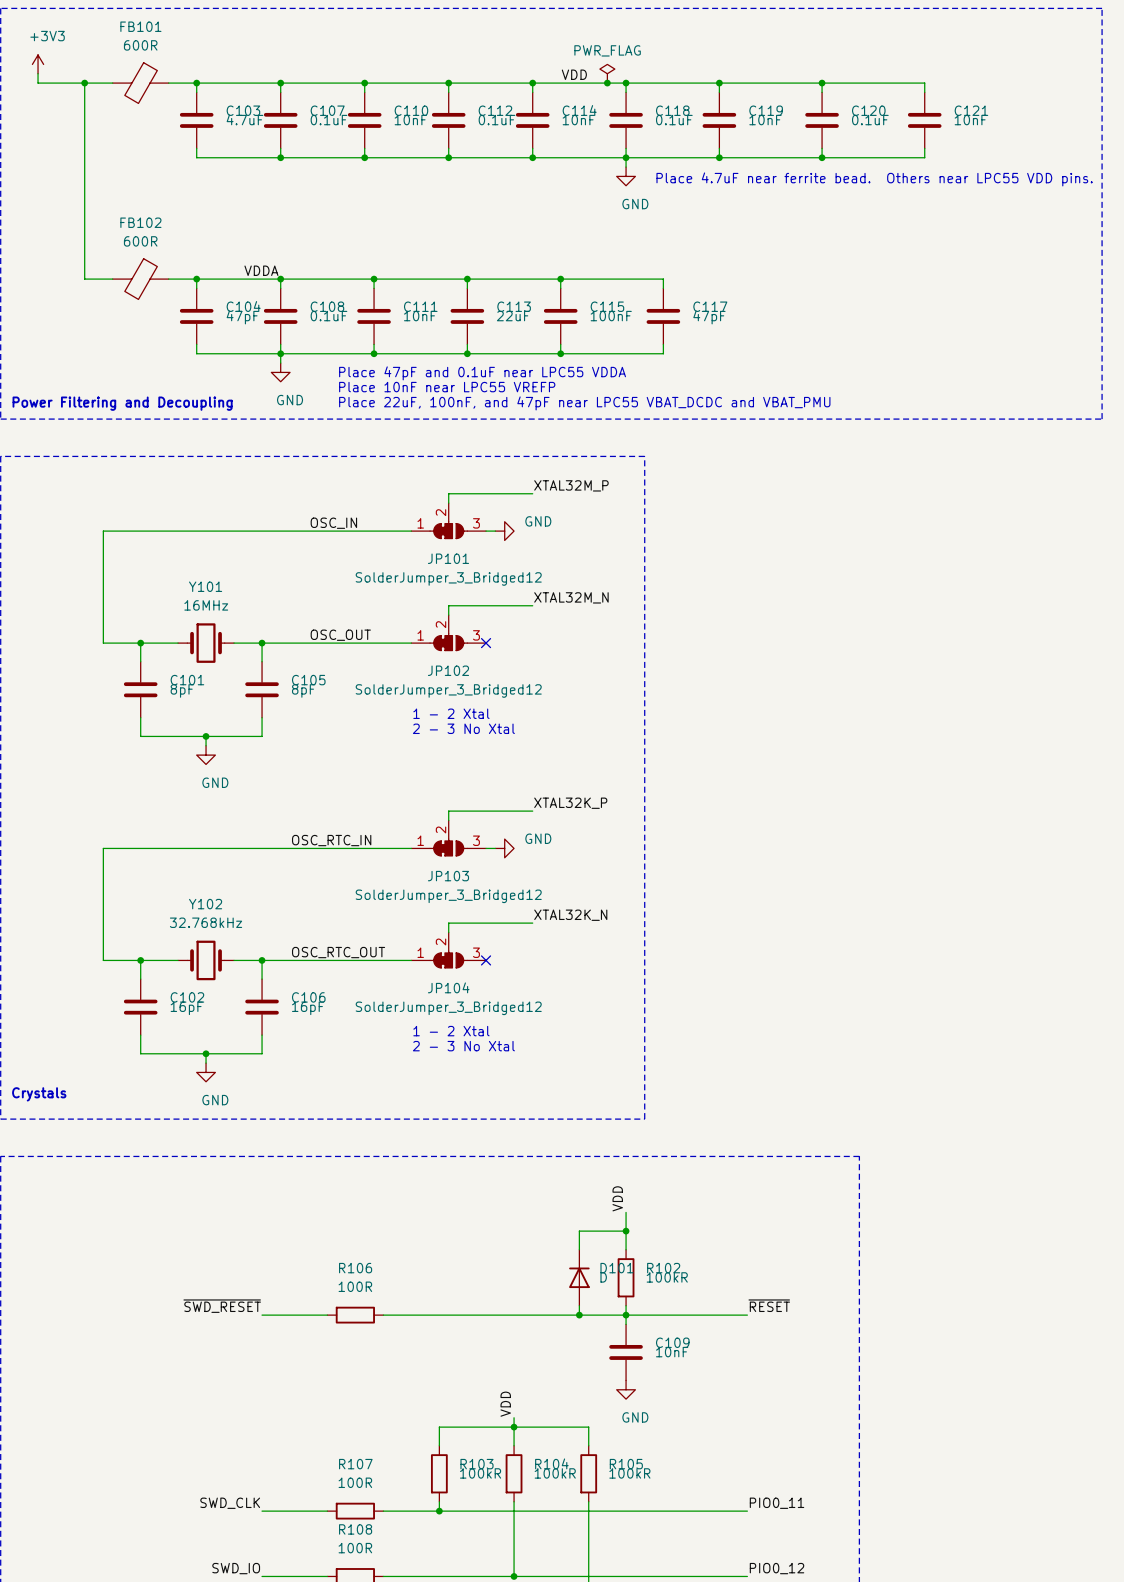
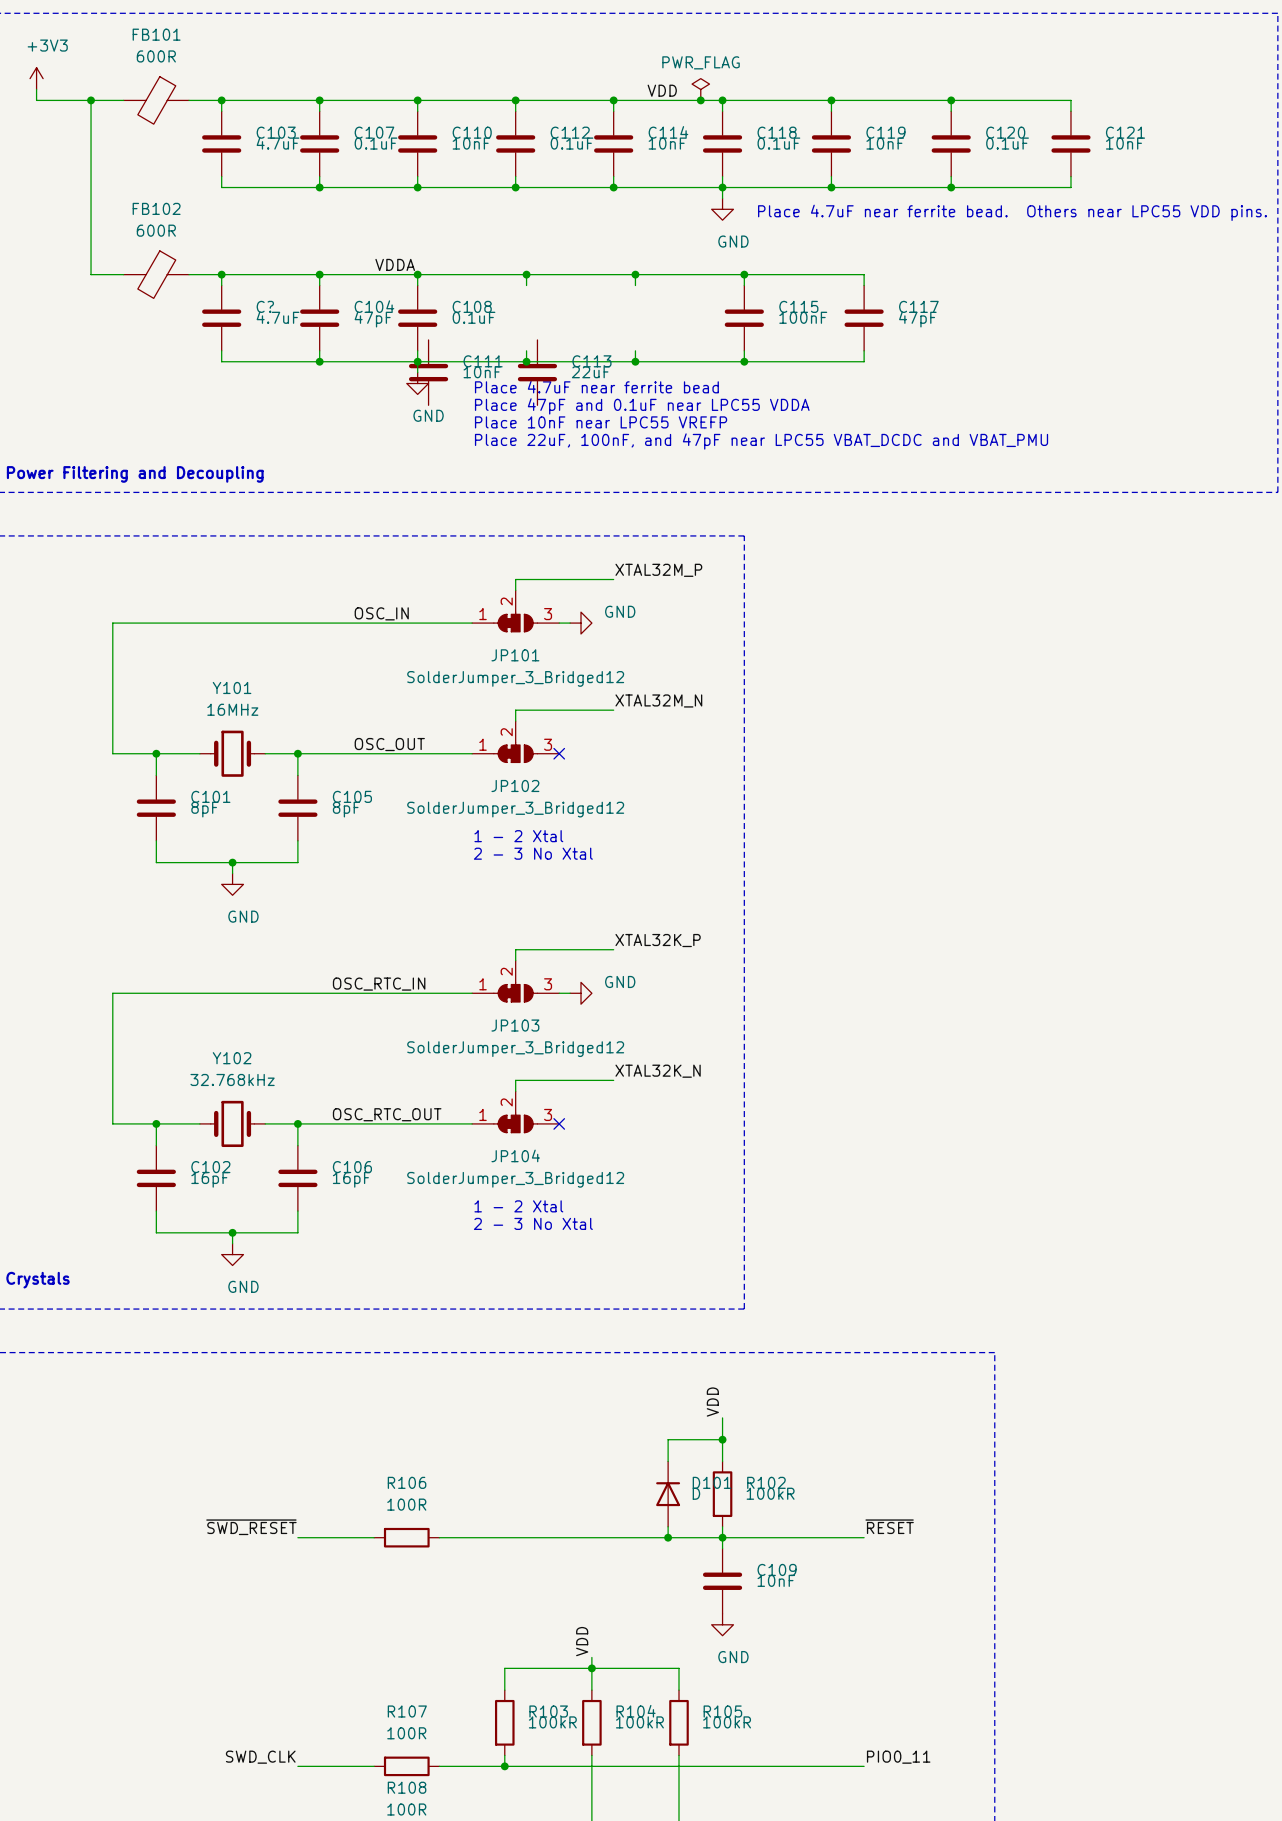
wire: (84, 232) (84, 279) (112, 279) -> (91, 274) (123, 274)
wire: none -> (189, 274) (864, 274) (864, 285)
wire: none -> (221, 274) (221, 285)
junction: none -> (221, 274)
junction: none -> (319, 274)
junction: none -> (417, 274)
junction: none -> (526, 274)
junction: none -> (635, 274)
junction: none -> (744, 274)
C?: none -> 4.7uF (221, 318)
label position: VDDA (261, 270) -> VDDA (395, 264)
FB102 position: (140, 279) -> (156, 274)
wire: (168, 279) (663, 279) (663, 288) -> none
junction: (196, 279) -> none
junction: (280, 279) -> none
wire: (374, 279) (374, 288) -> (526, 274) (526, 285)
junction: (374, 279) -> none
wire: (467, 279) (467, 288) -> (635, 274) (635, 285)
junction: (467, 279) -> none
wire: (560, 279) (560, 288) -> (744, 274) (744, 285)
junction: (560, 279) -> none
wire: none -> (221, 350) (221, 361) (864, 361) (864, 350)
junction: none -> (319, 361)
junction: none -> (417, 361)
junction: none -> (526, 361)
junction: none -> (635, 361)
junction: none -> (744, 361)
C104 position: (196, 316) -> (319, 318)
C108 position: (280, 316) -> (417, 318)
C115 position: (560, 316) -> (744, 318)
C117 position: (663, 316) -> (864, 318)
text: none -> Place 4.7uF near ferrite bead (596, 387)
wire: (196, 344) (196, 353) (663, 353) (663, 344) -> none
wire: (280, 344) (280, 363) -> (417, 350) (417, 372)
wire: (374, 344) (374, 353) -> (526, 350) (526, 361)
wire: (467, 344) (467, 353) -> (635, 350) (635, 361)
wire: (560, 344) (560, 353) -> (744, 350) (744, 361)
junction: (280, 353) -> none
junction: (374, 353) -> none
junction: (467, 353) -> none
junction: (560, 353) -> none
power symbol position: GND (280, 372) -> GND (417, 383)
text position: Place 47pF and 0.1uF near LPC55 VDDA (482, 373) -> Place 47pF and 0.1uF near LPC55 VDDA (642, 406)
text position: Place 10nF near LPC55 VREFP (447, 387) -> Place 10nF near LPC55 VREFP (601, 422)
text position: Place 22uF, 100nF, and 47pF near LPC55 VBAT_DCDC and VBAT_PMU (584, 403) -> Place 22uF, 100nF, and 47pF near LPC55 VBAT_DCDC and VBAT_PMU (761, 441)

